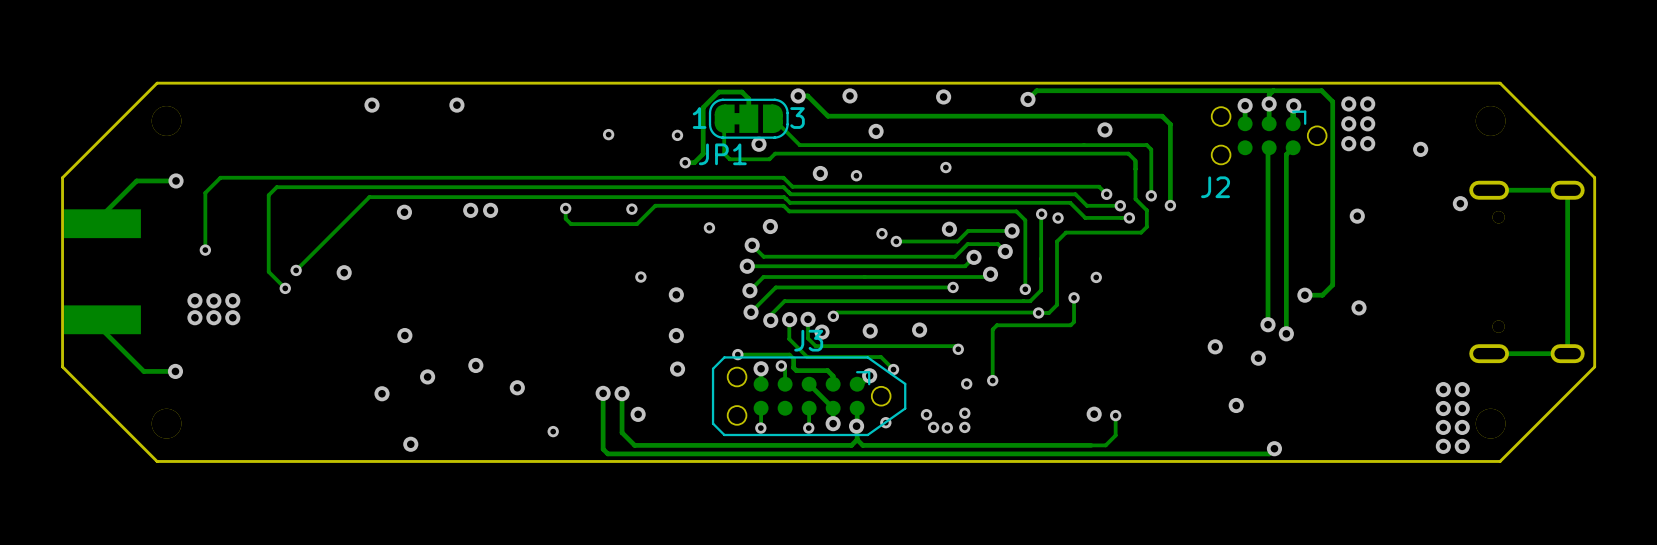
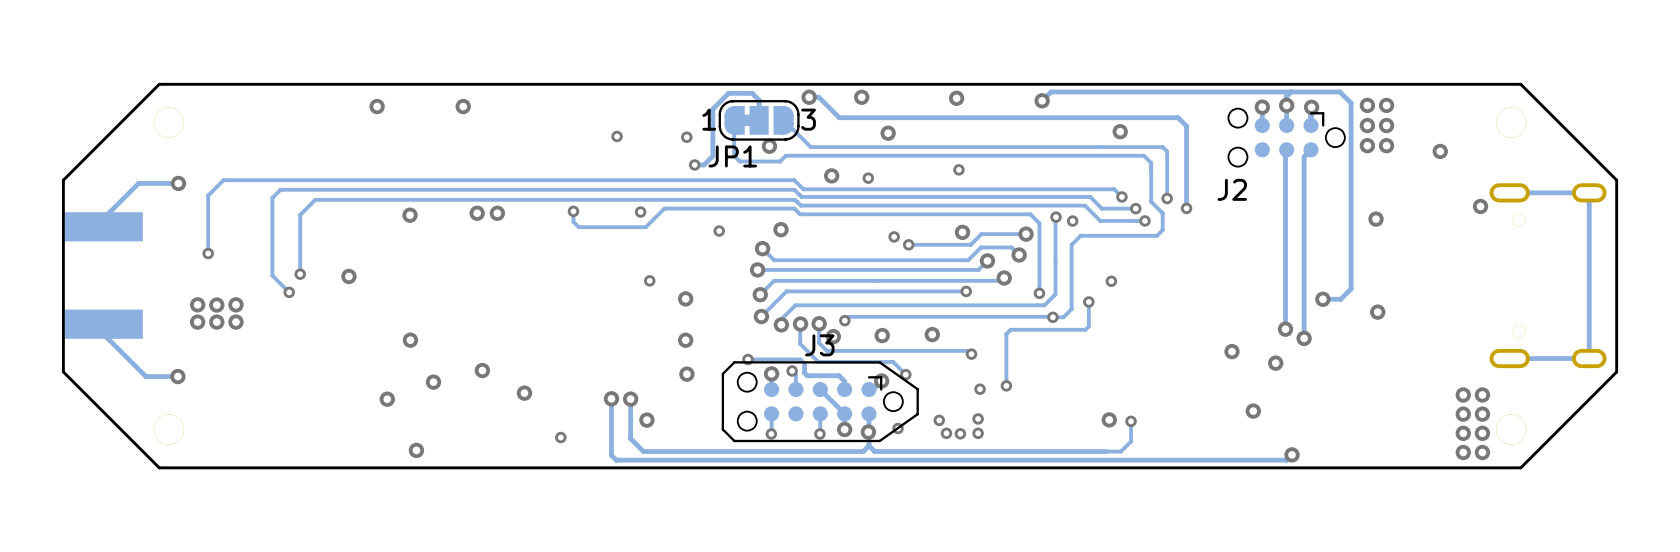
track: (369, 197) (296, 270) -> (374, 199) (315, 199) (300, 214) (300, 274)

